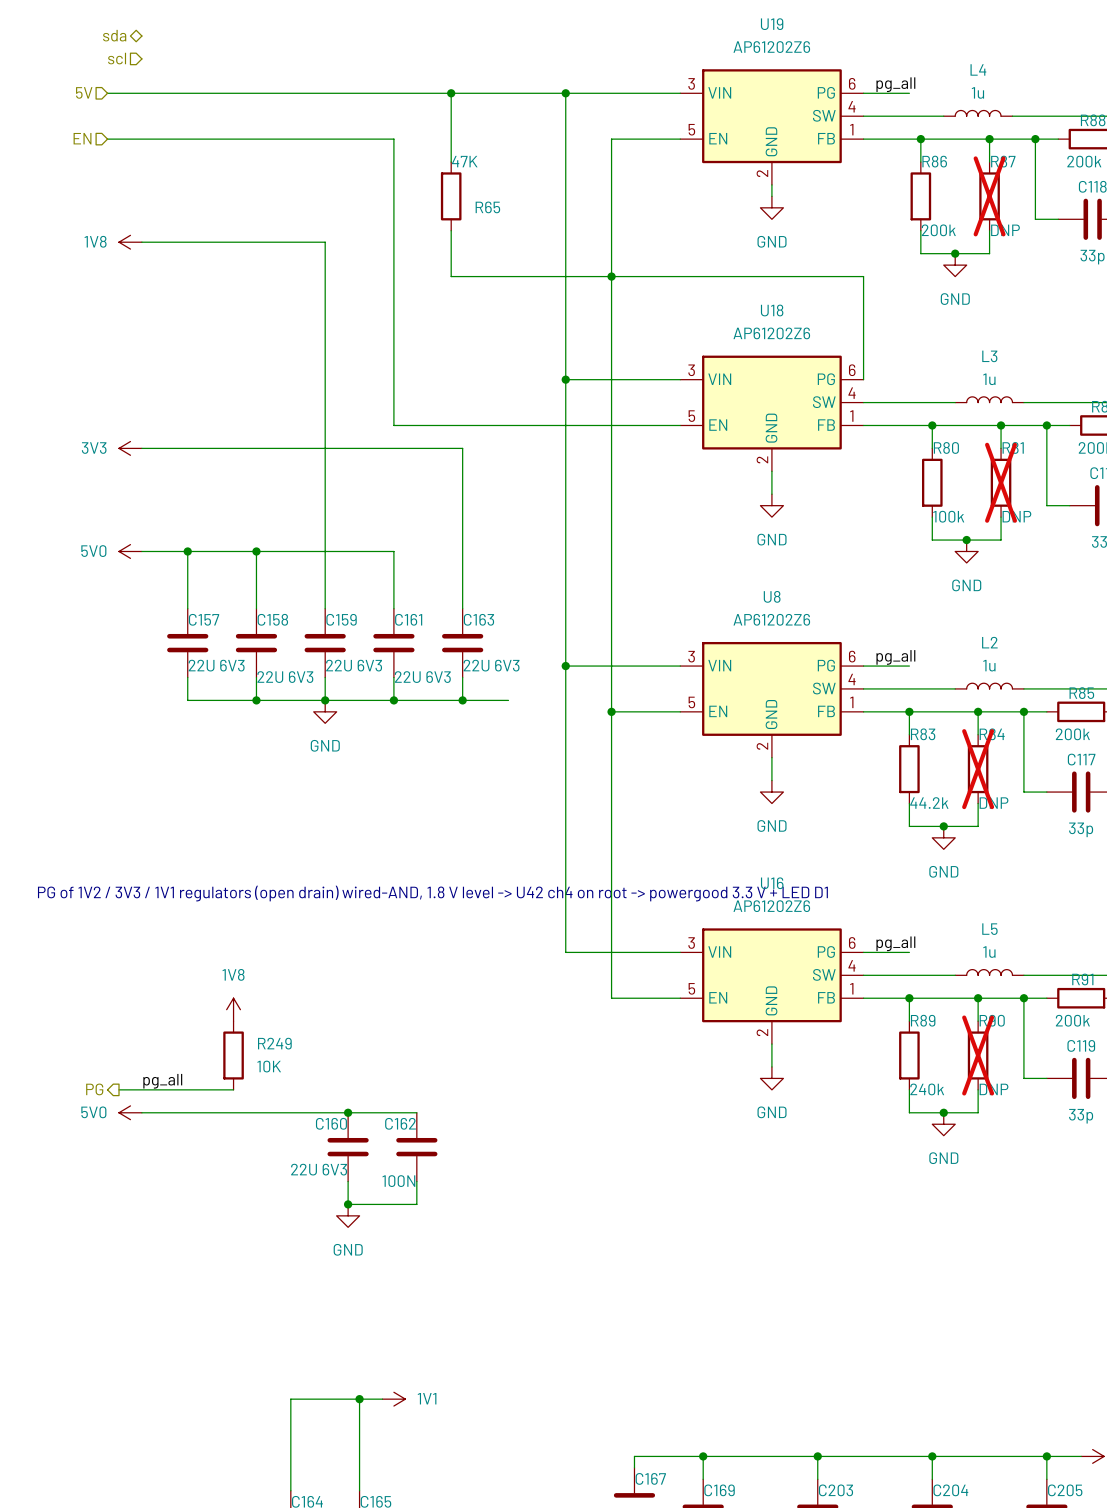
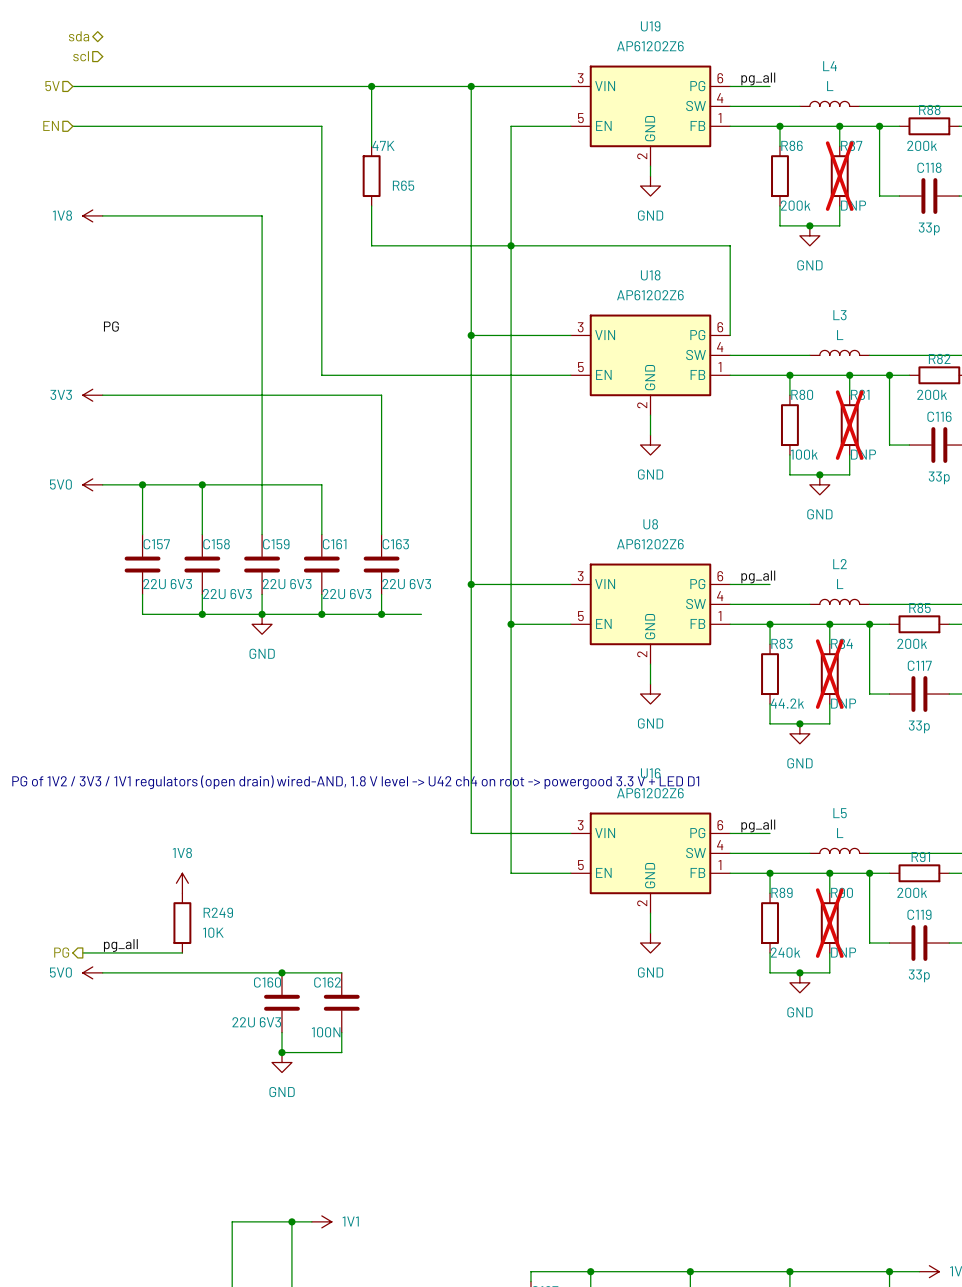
L4 value: 1u (977, 92) -> L (830, 86)
label: none -> PG (111, 326)
L3 value: 1u (989, 379) -> L (840, 335)
L2 value: 1u (989, 665) -> L (840, 584)
L5 value: 1u (989, 952) -> L (840, 833)

